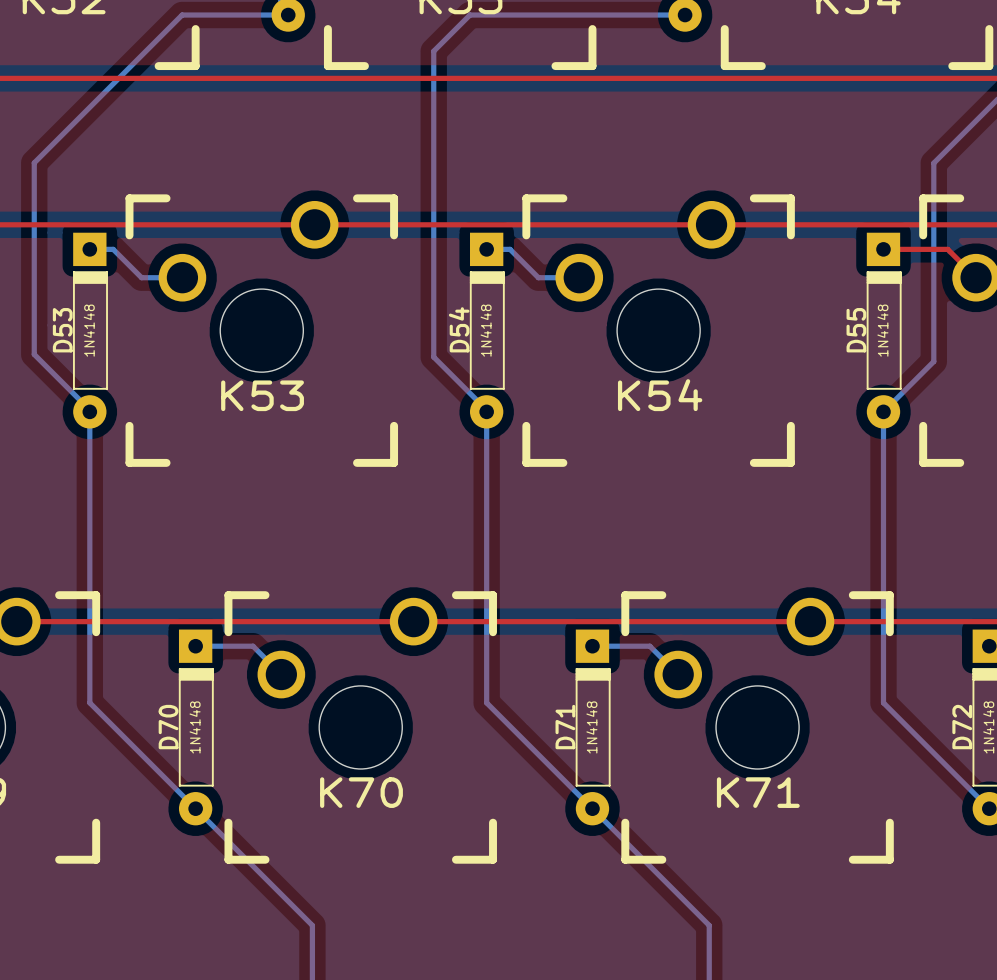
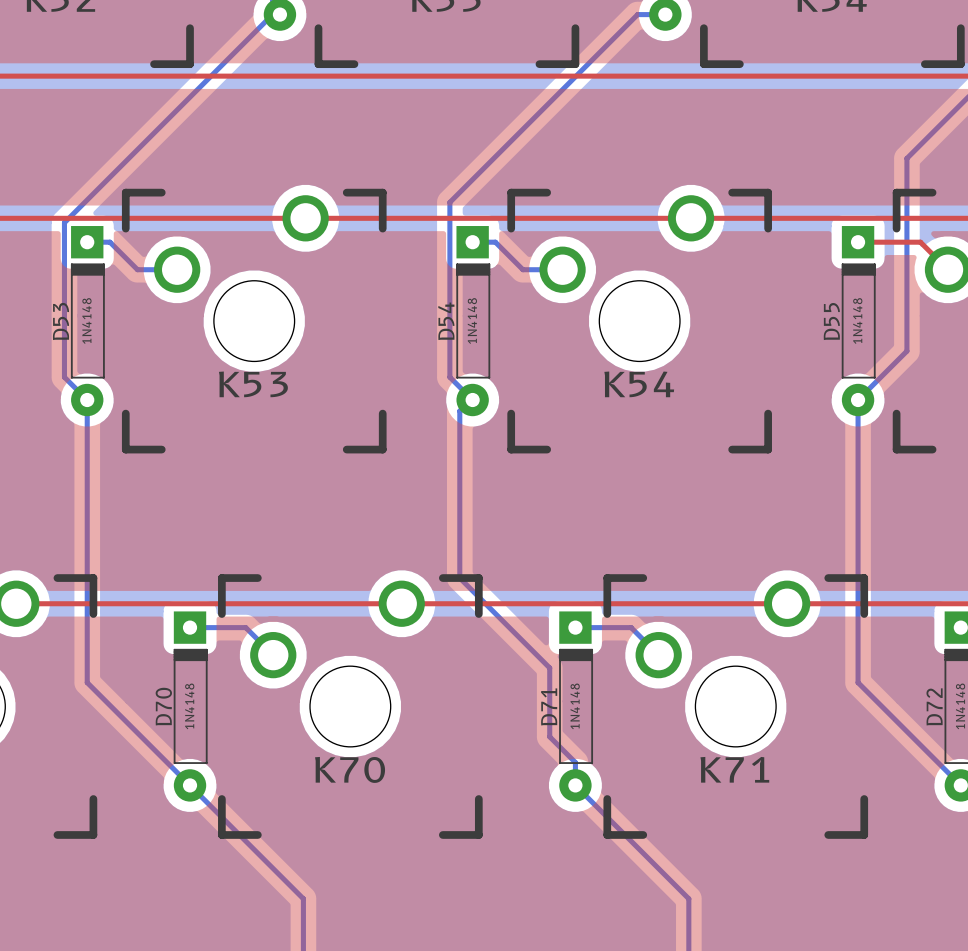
bottom track: (280, 15) (182, 15) (34, 162) (34, 354) (89, 409) -> (272, 14) (64, 222) (64, 377) (87, 400)
bottom track: (656, 15) (469, 15) (433, 51) (433, 357) (486, 409) -> (637, 14) (449, 202) (449, 377) (472, 400)
bottom track: (486, 412) (486, 702) (592, 808) -> (472, 398) (459, 411) (459, 578) (549, 667) (549, 736) (575, 762) (575, 785)

